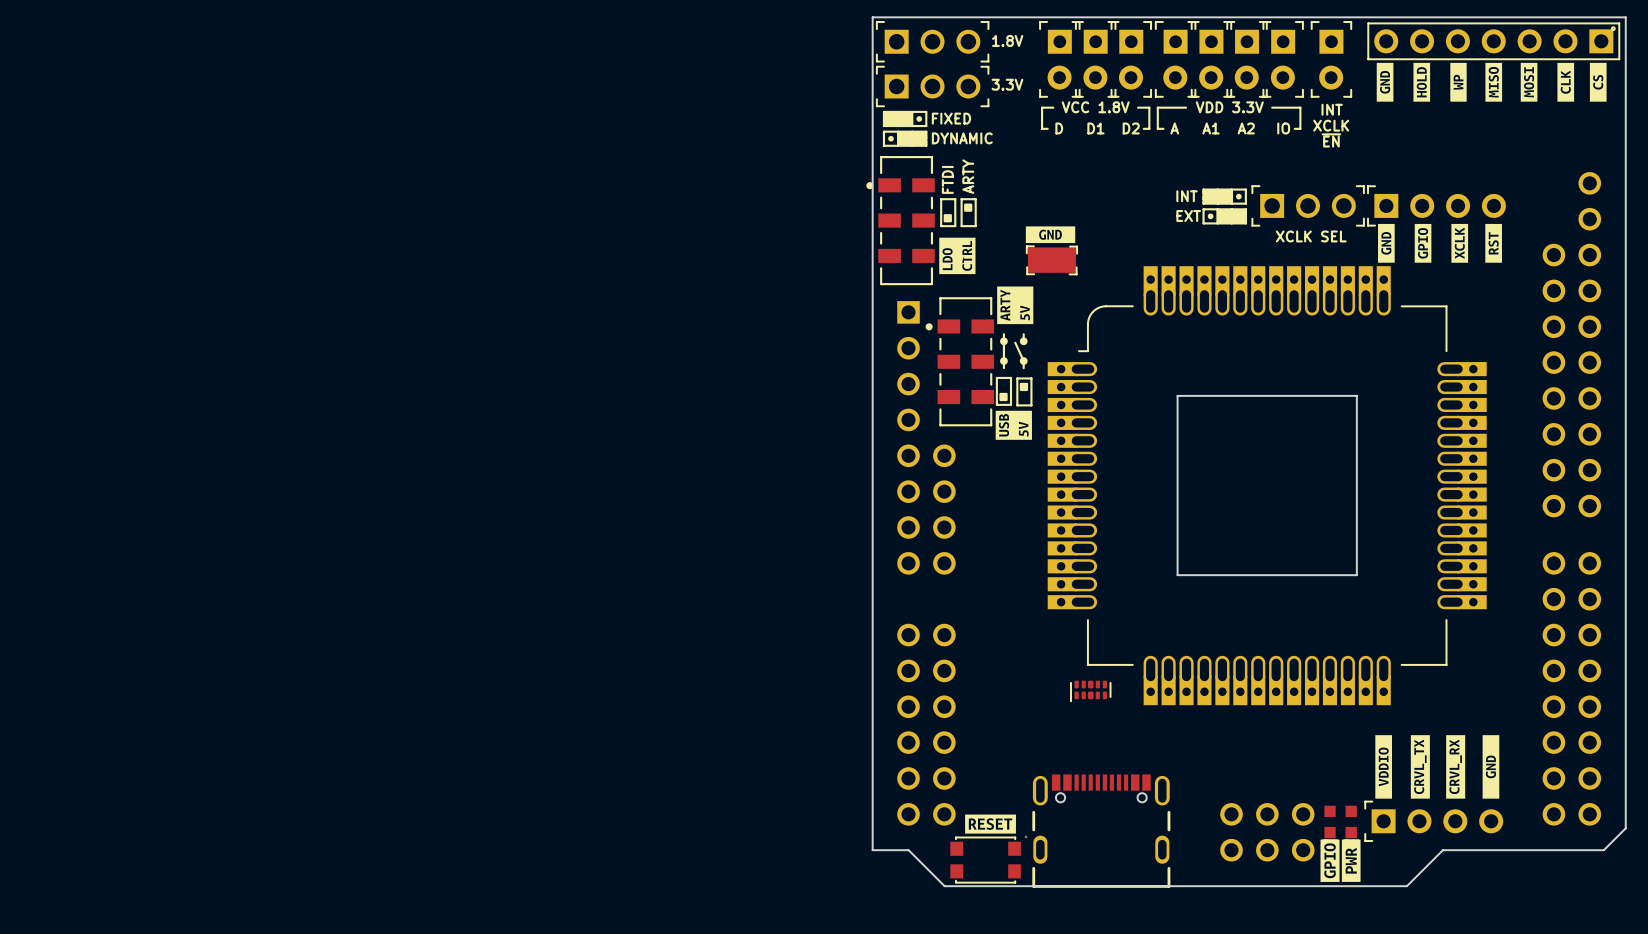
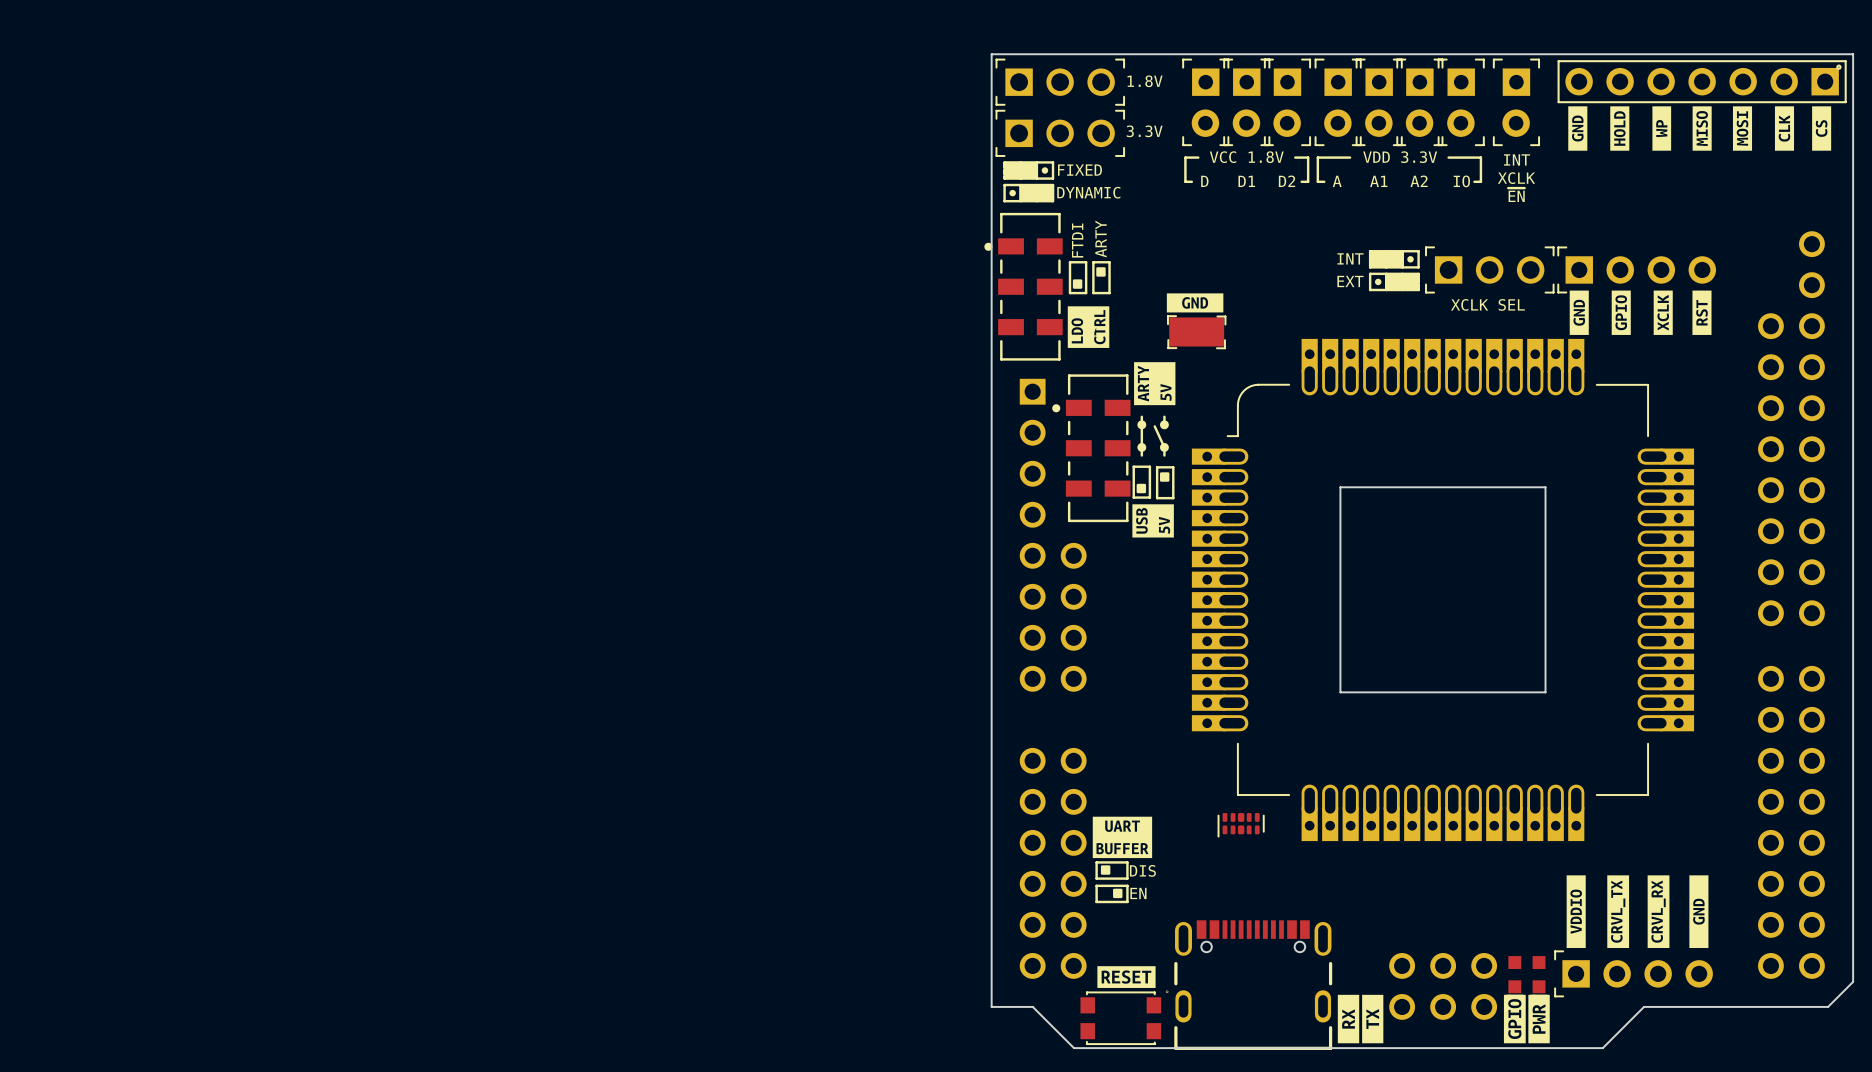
drawing: none -> [1092, 816, 1153, 899]
line: none -> (1096, 862) (1096, 878) (1127, 878) (1127, 862) (1096, 862)
text: none -> DIS (1142, 870)
line: none -> (1096, 885) (1127, 885) (1127, 901) (1096, 901) (1096, 885)
text: none -> EN (1138, 893)
drawing: none -> [1337, 994, 1384, 1044]

